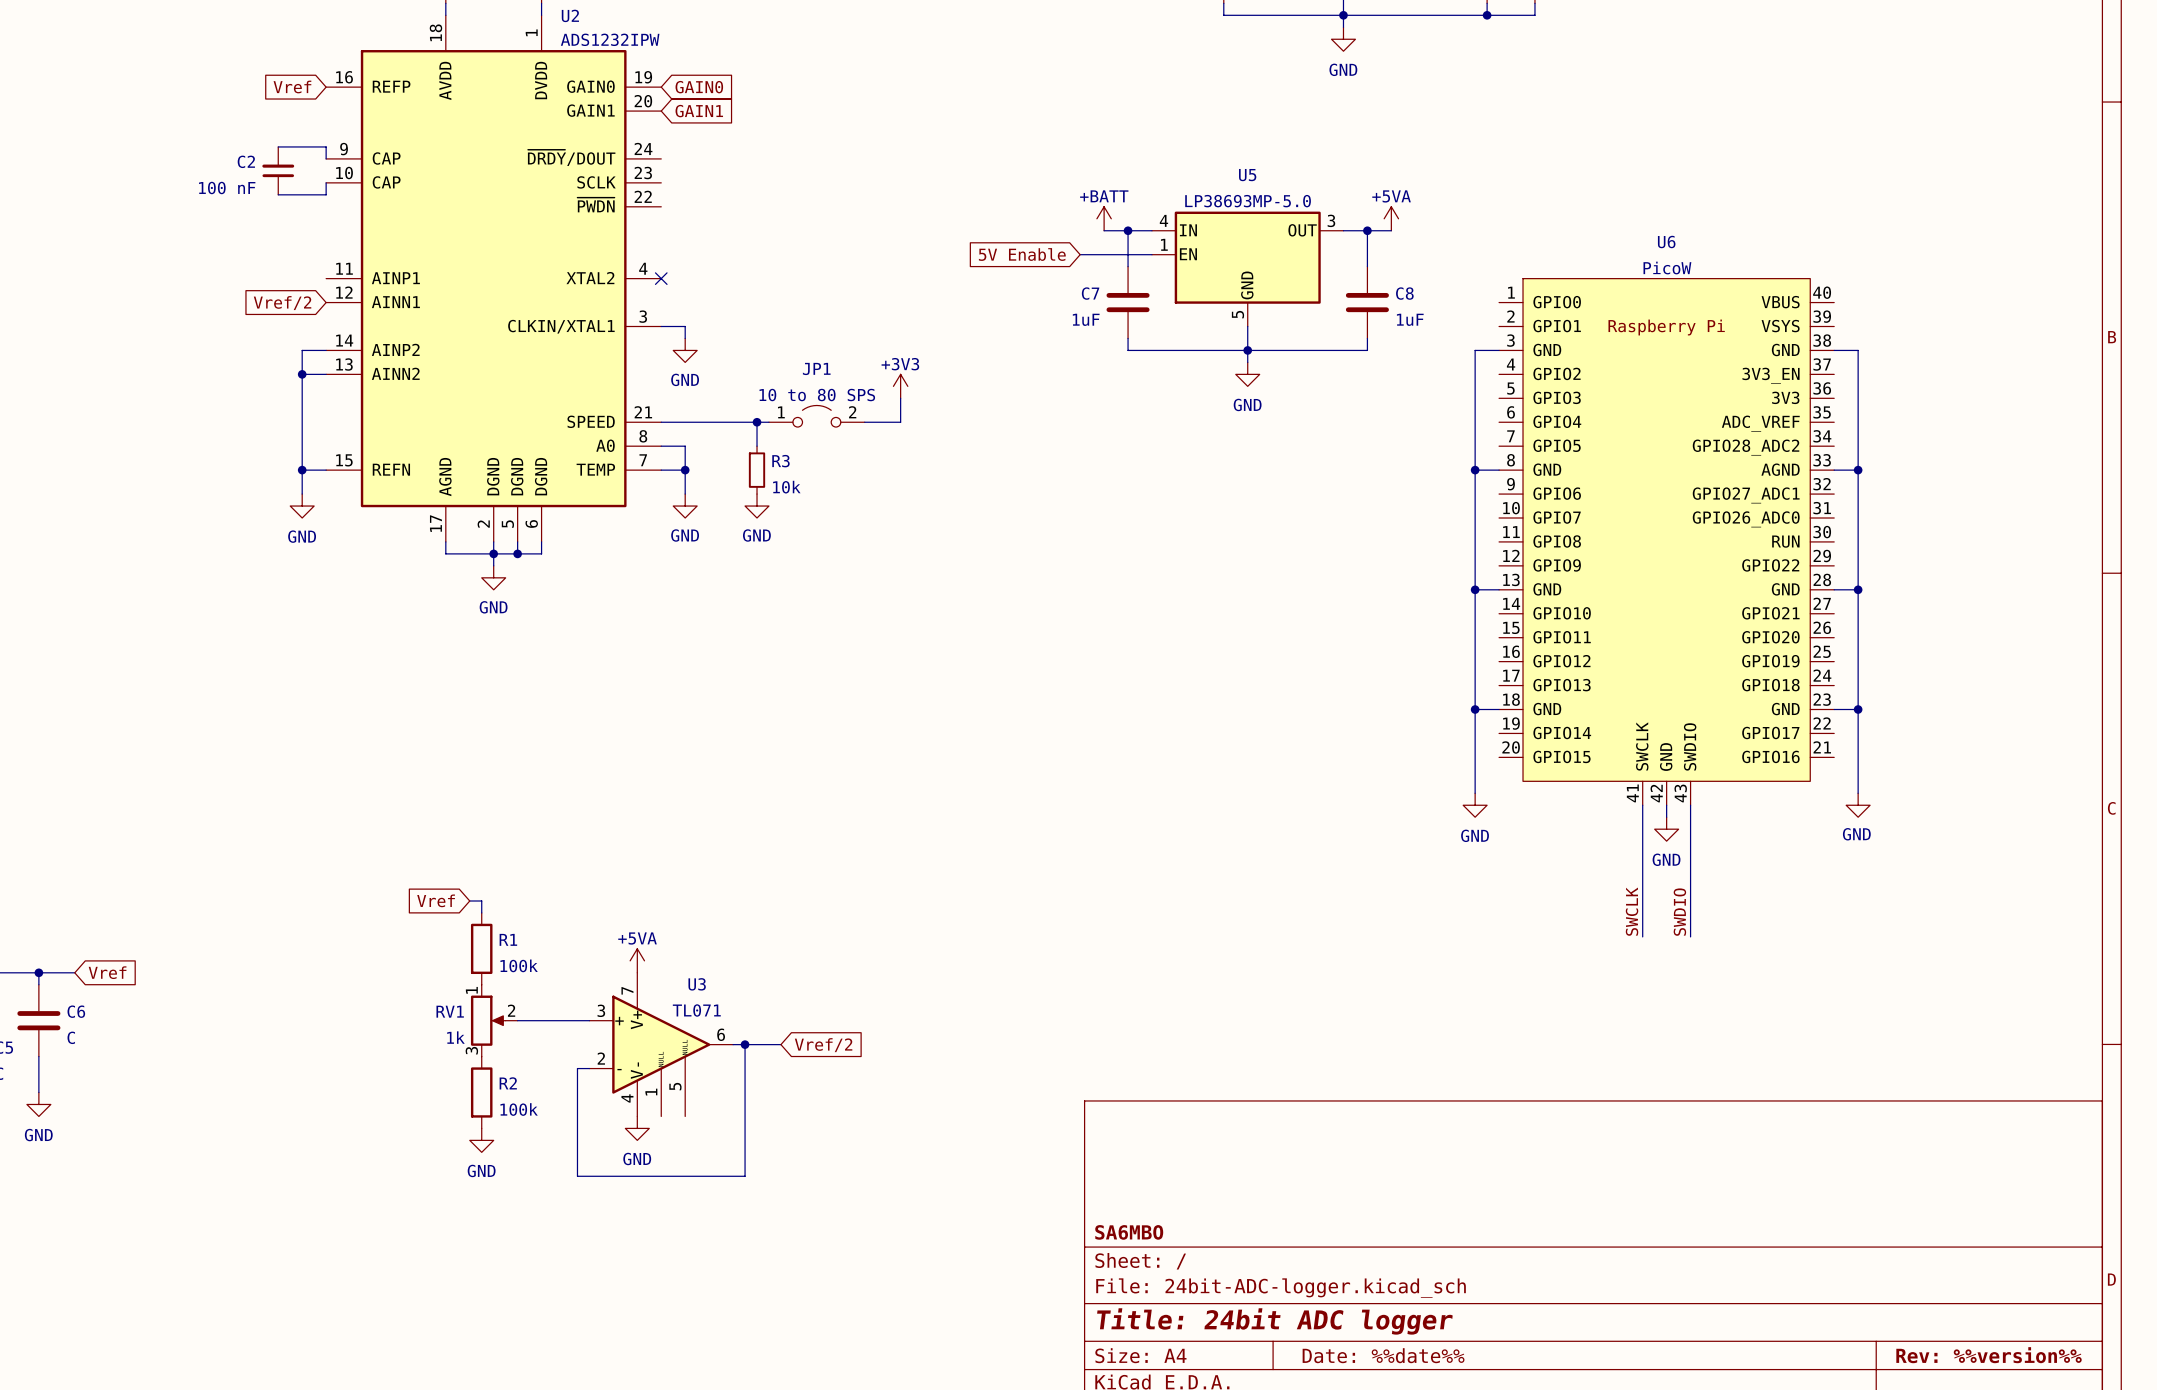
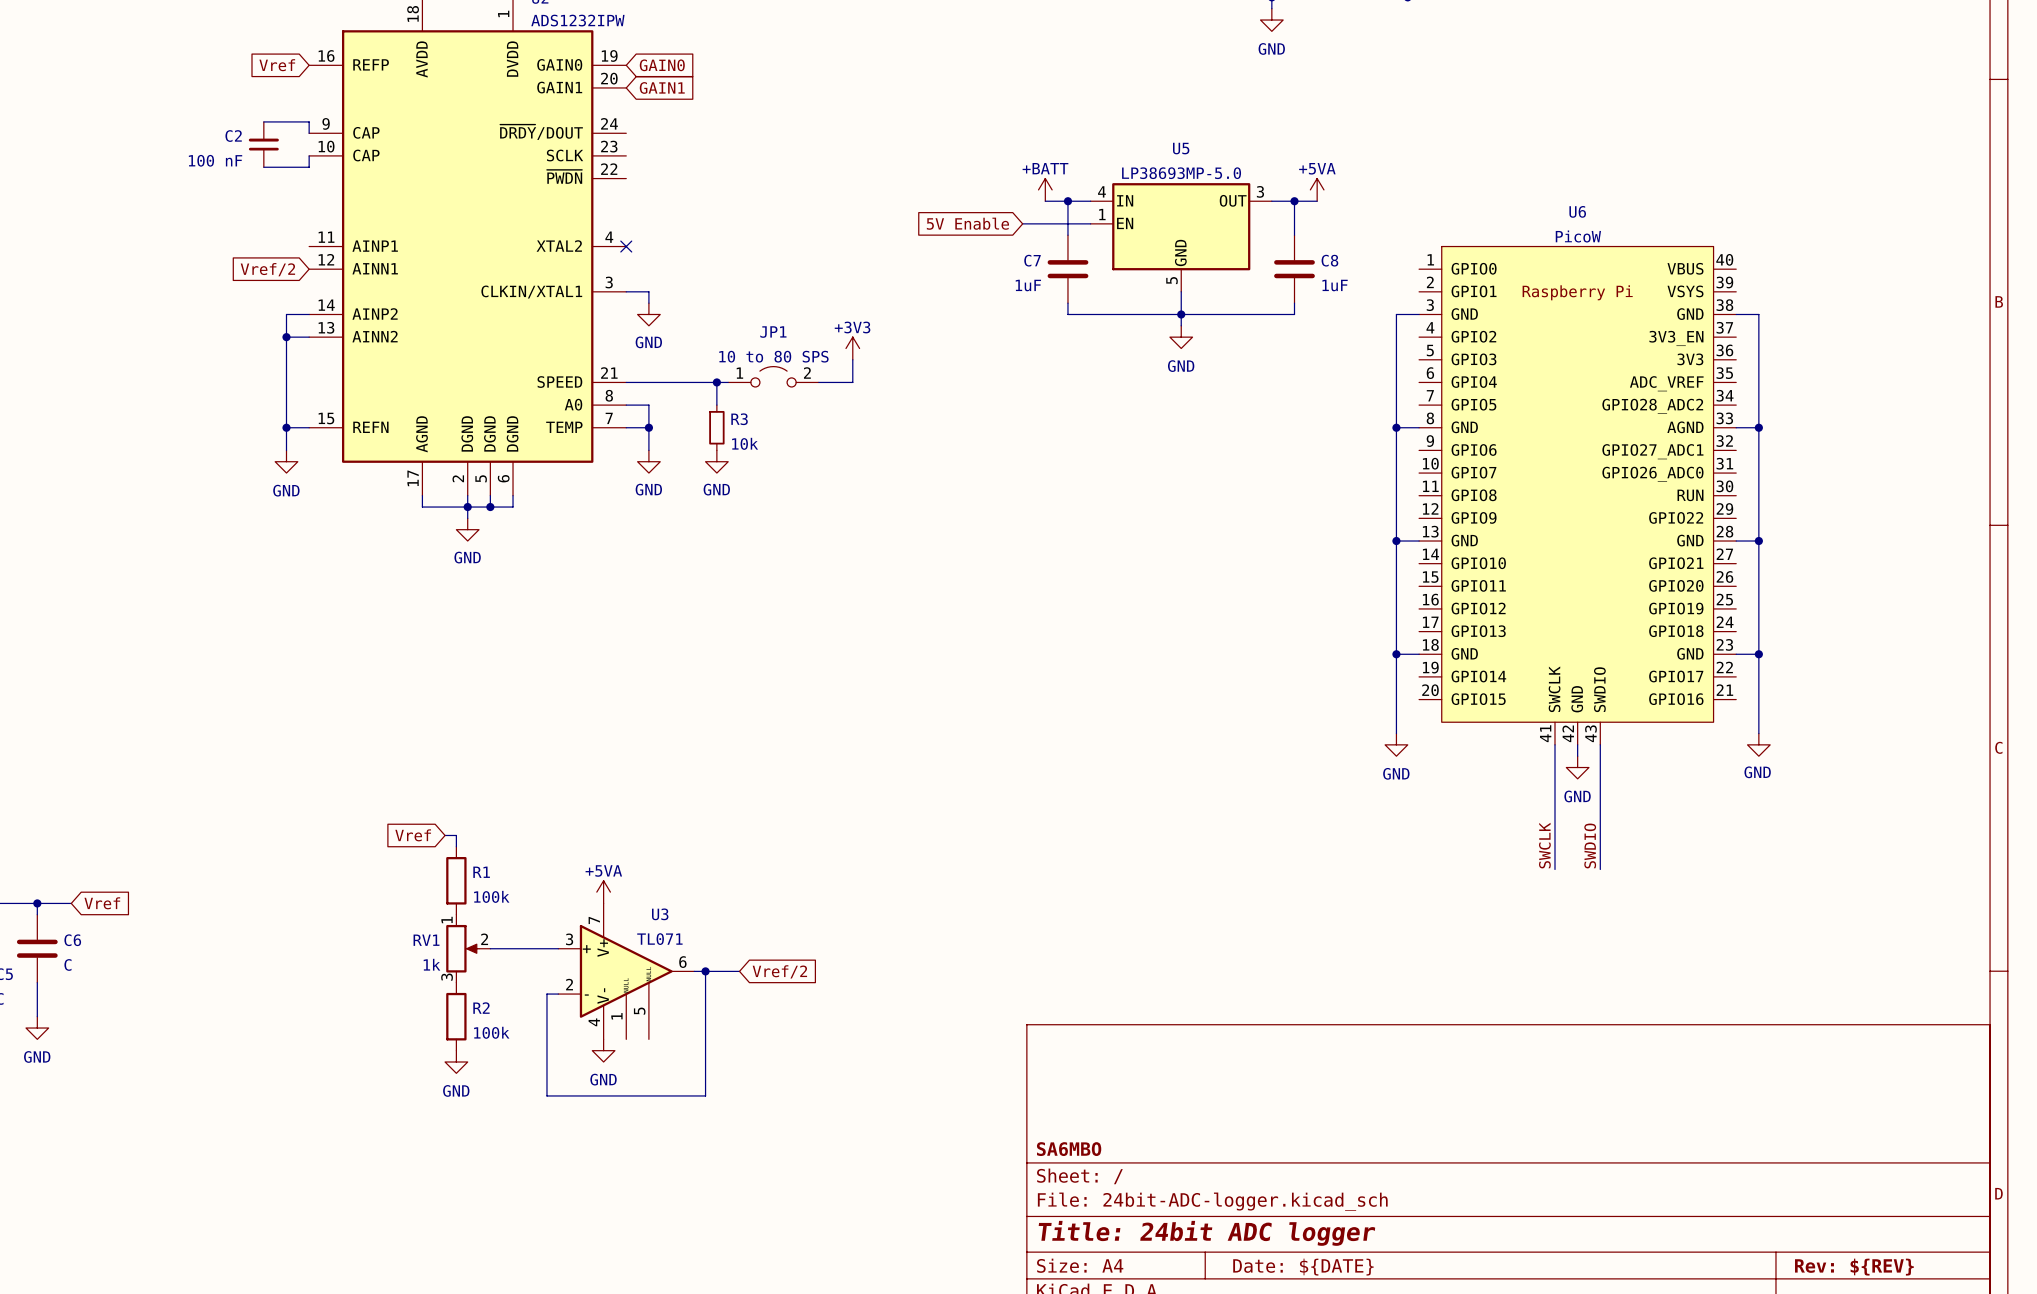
title block: Date: %%date%% (1383, 1355) -> Date: ${DATE} (1303, 1267)
title block: Rev: %%version%% (1989, 1355) -> Rev: ${REV} (1854, 1267)

